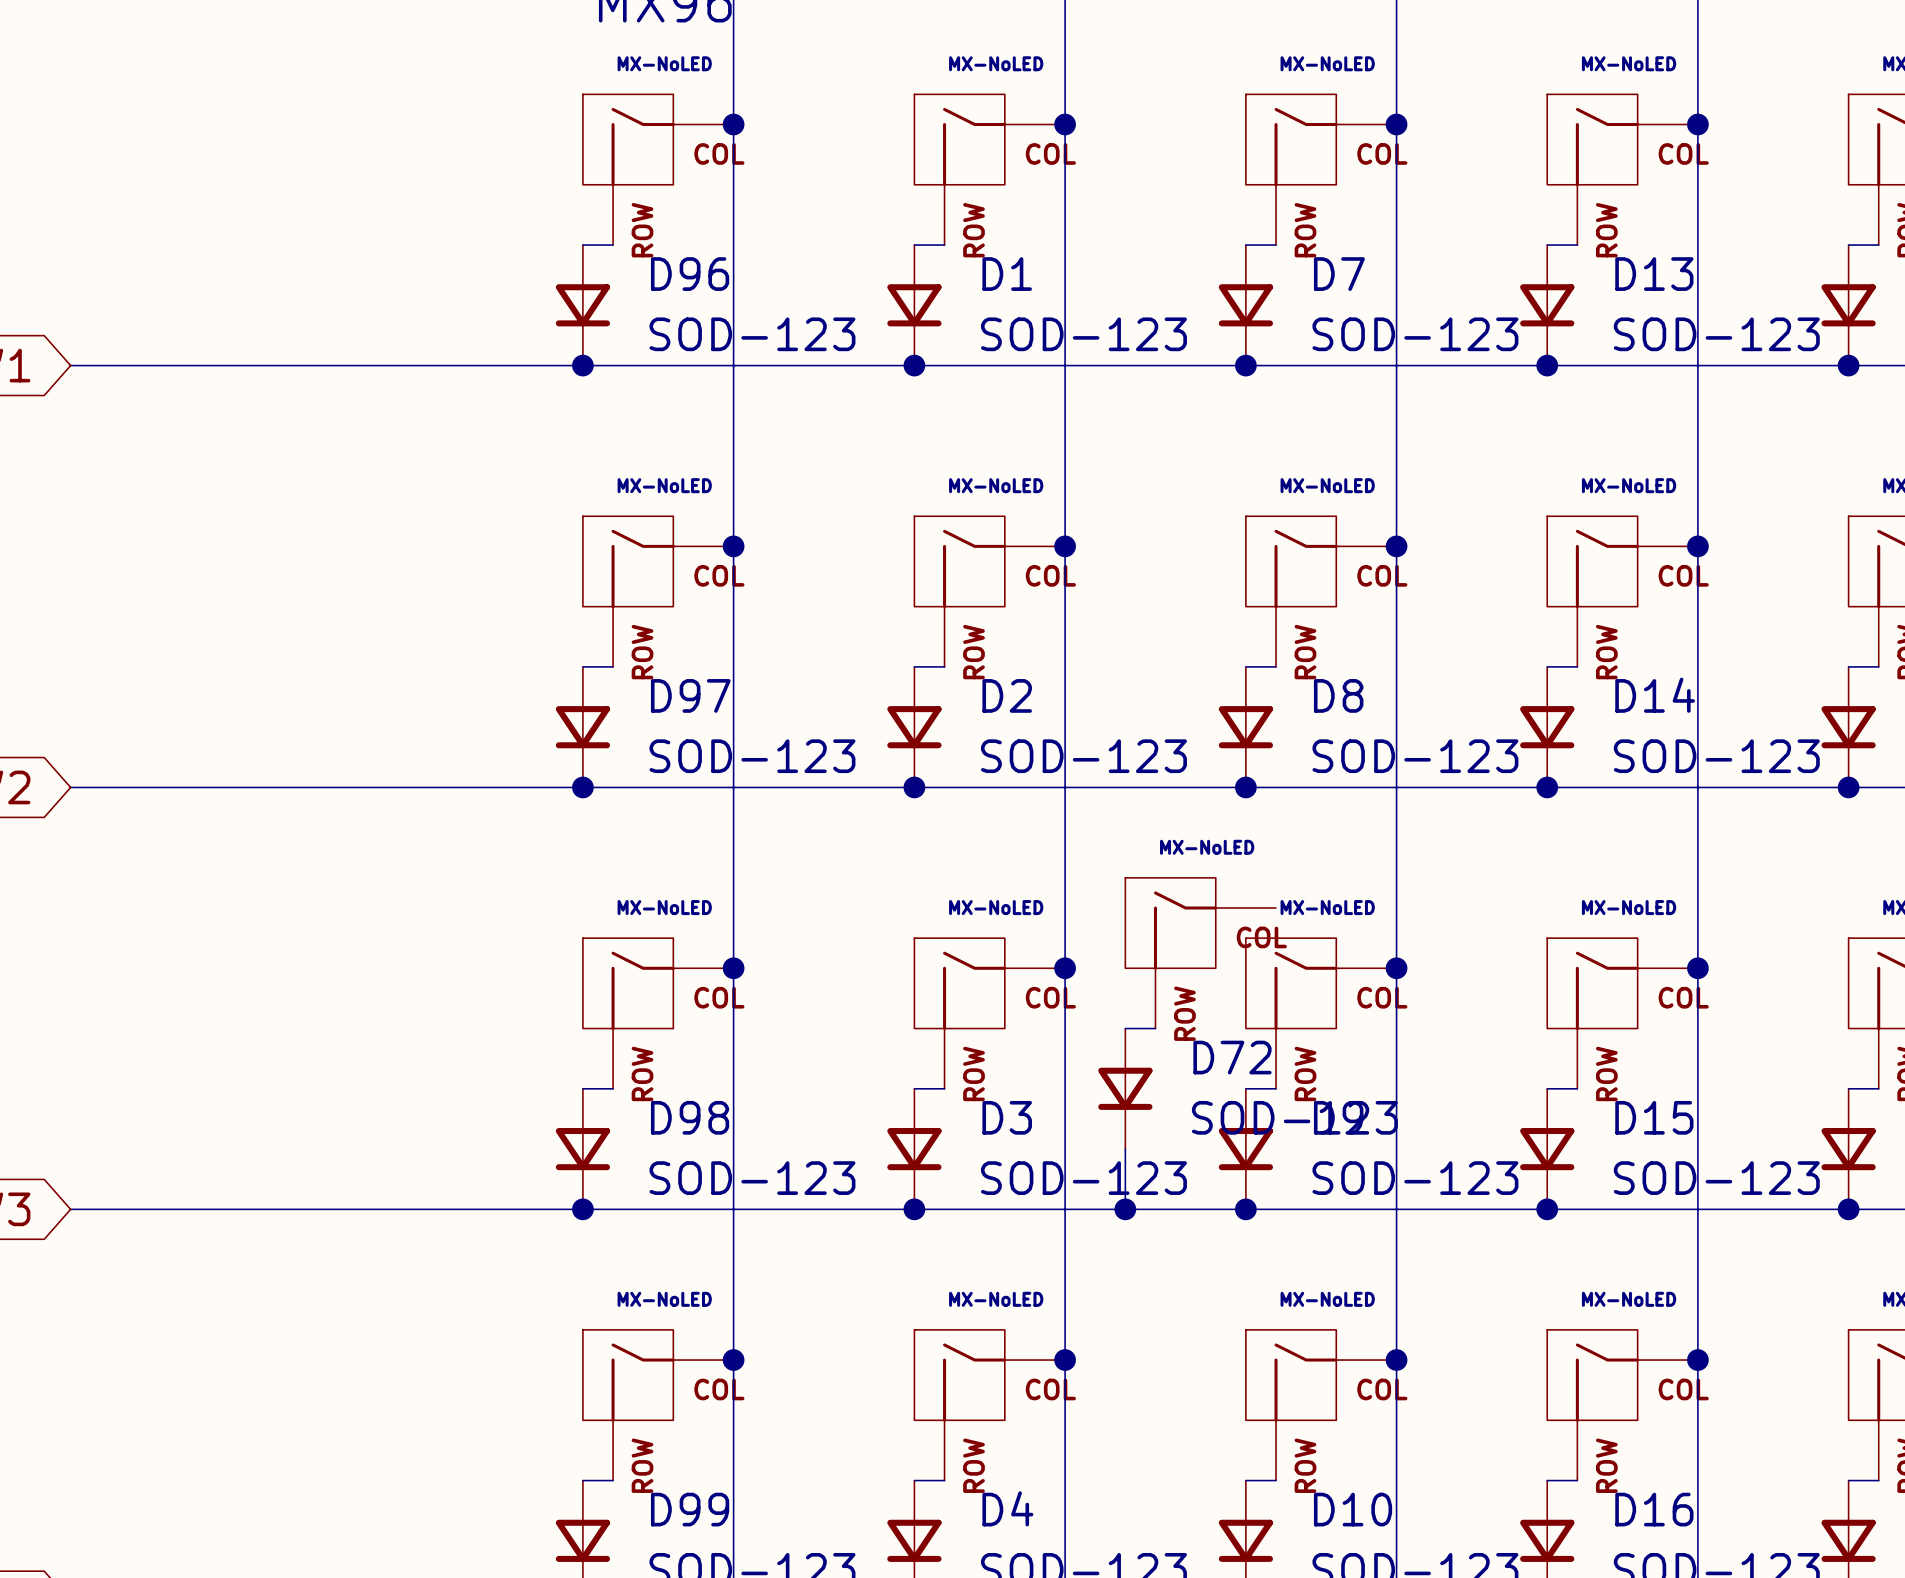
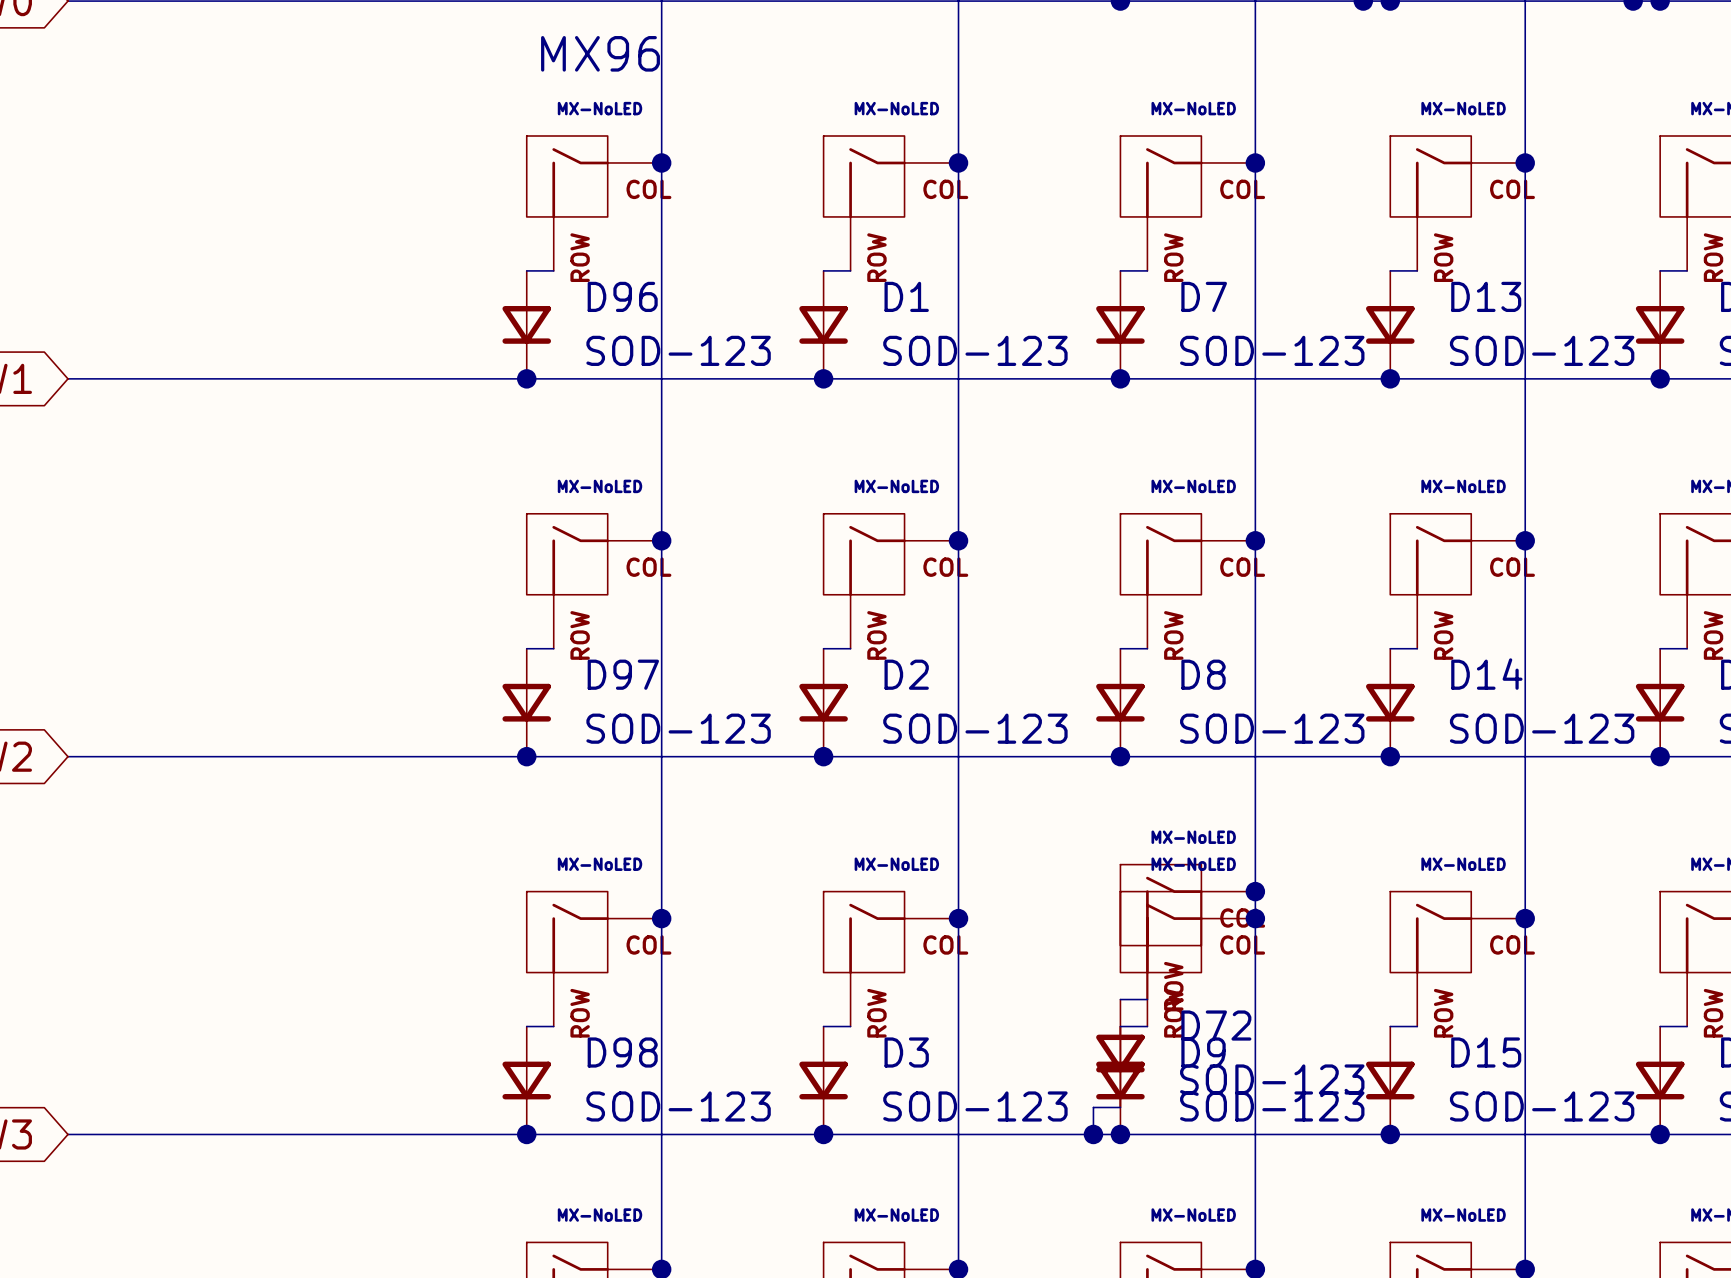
junction: none -> (1255, 891)
part position: (1200, 953) -> (1187, 932)
wire: (1125, 1028) (1155, 1028) -> (1120, 999) (1147, 999)
D72 position: (1125, 1088) -> (1120, 1053)
wire: (1125, 1149) (1125, 1209) -> none
wire: none -> (1120, 1107) (1093, 1107) (1093, 1134)
junction position: (1125, 1209) -> (1093, 1134)

